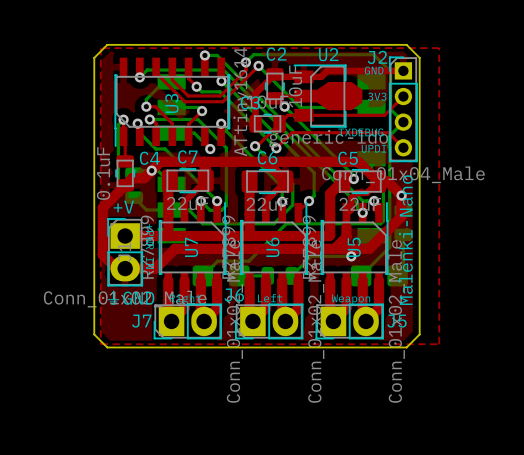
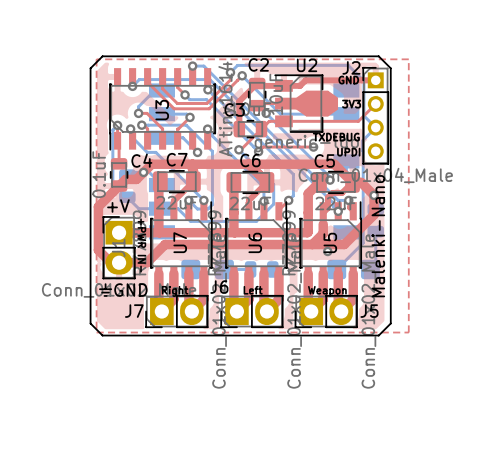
top track: (281, 143) (291, 132) (388, 132) (403, 147) -> (263, 147) (313, 147)
via: none -> (313, 147)
bottom track: (383, 181) (383, 221) (380, 223) (286, 223) (248, 261) (217, 261) (202, 275) -> none
bottom track: (351, 256) (311, 256) (291, 275) -> none

